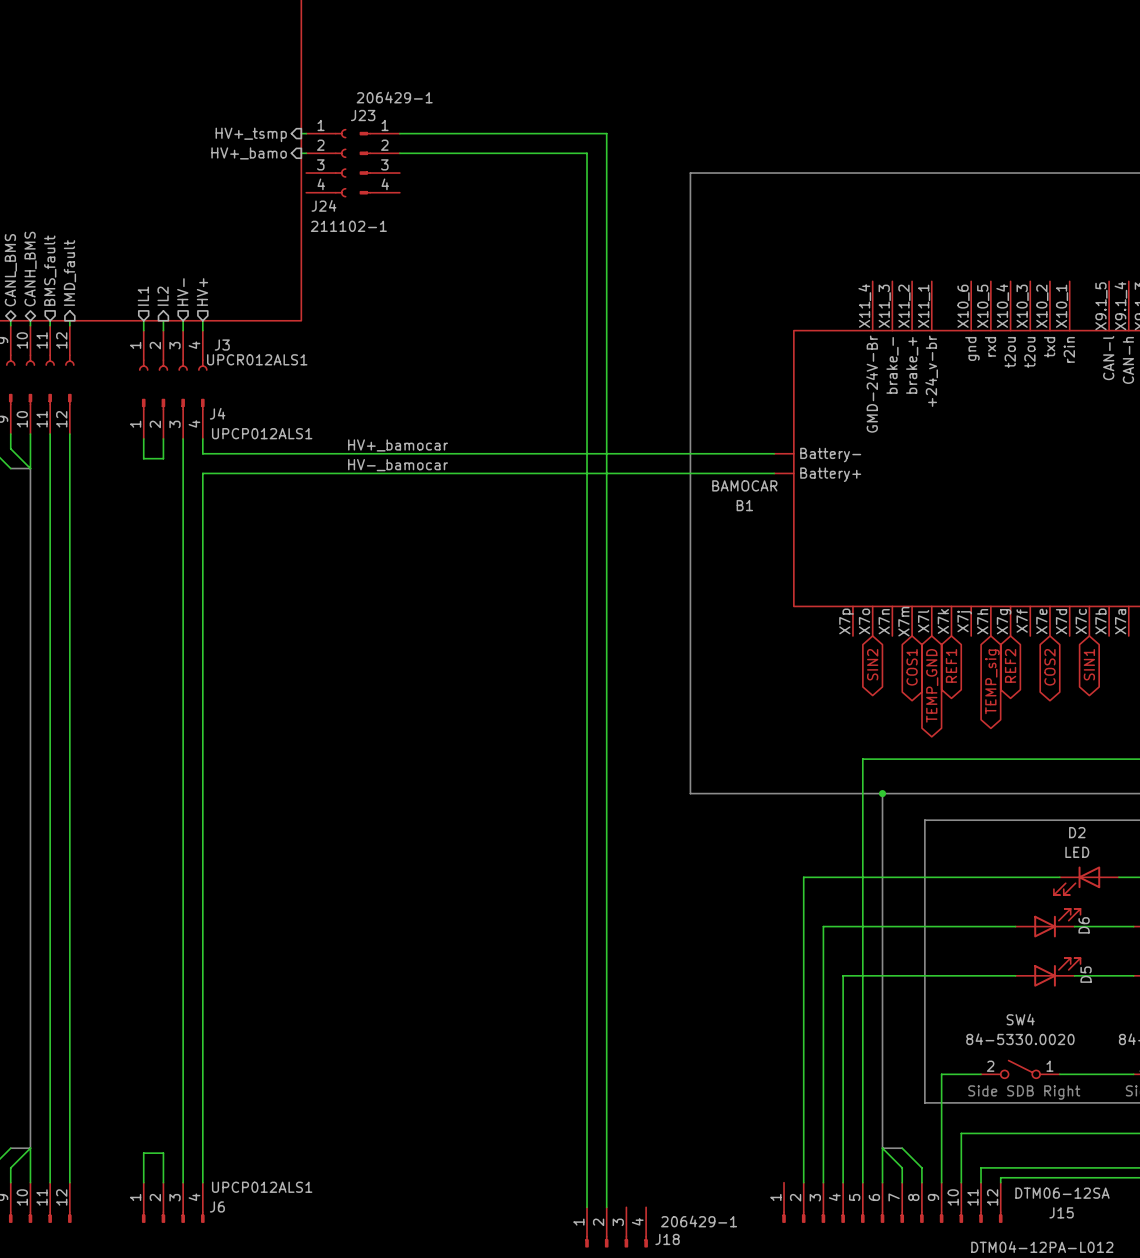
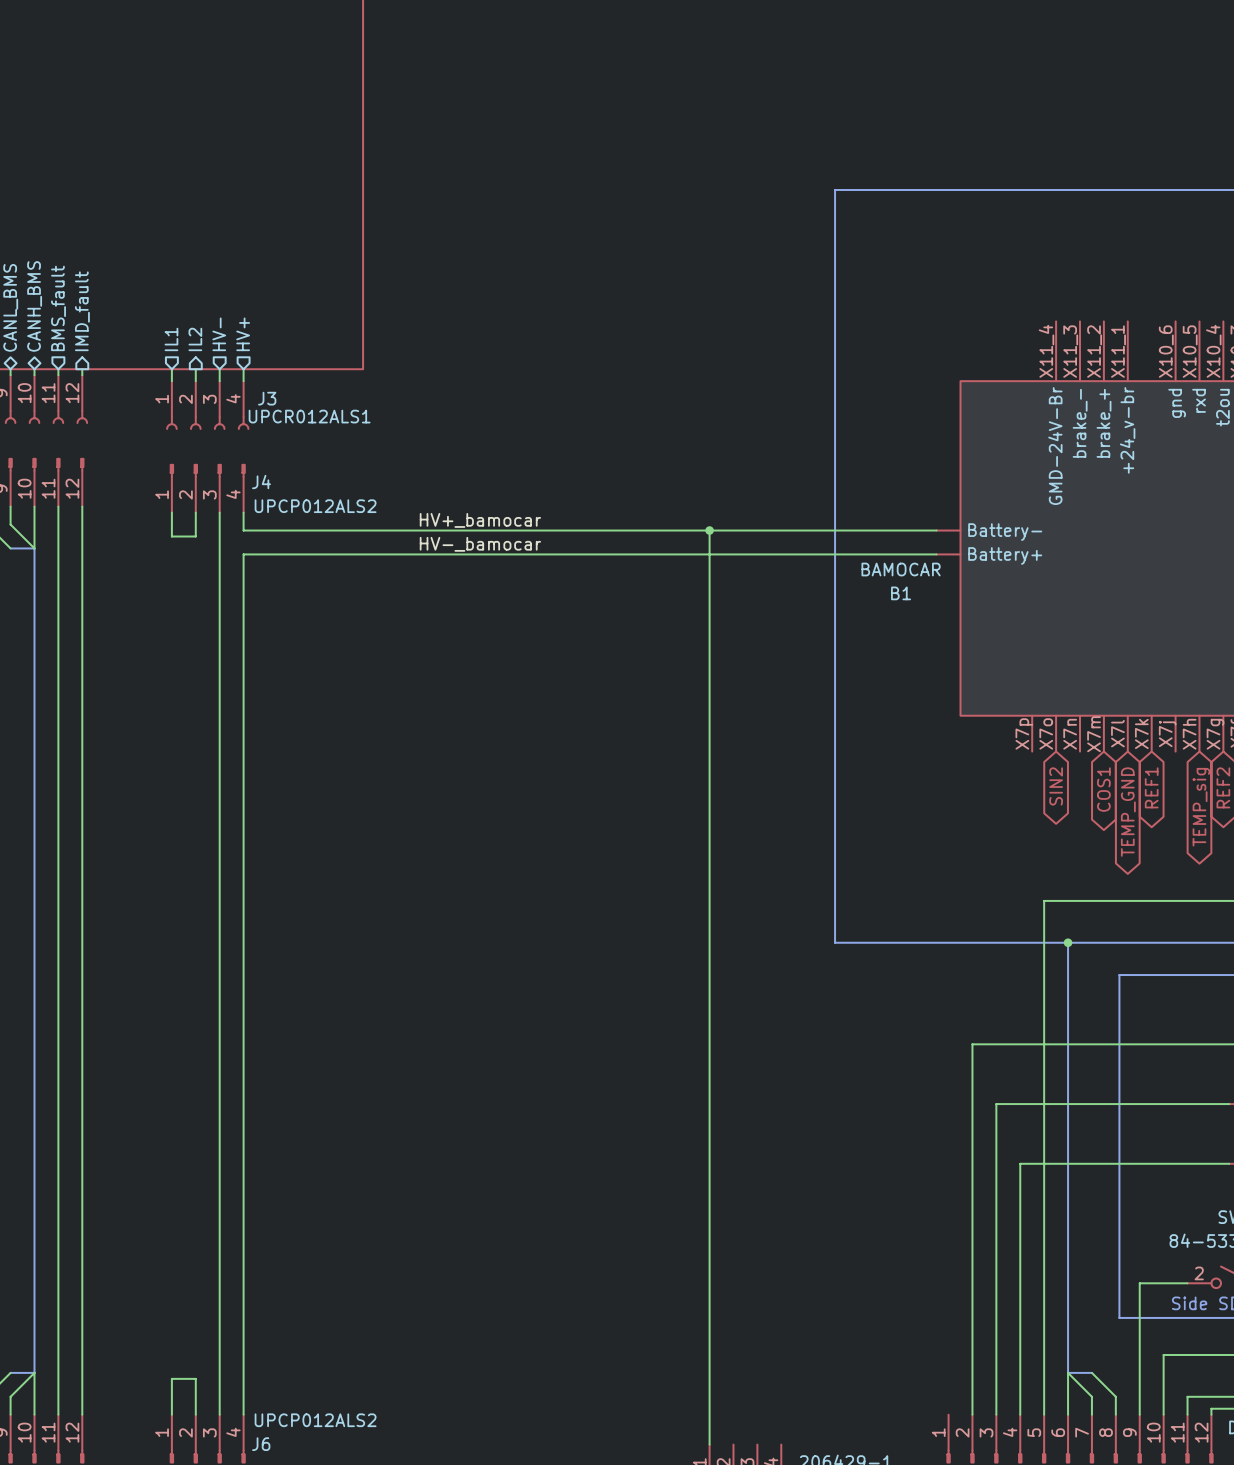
wire: (301, 133) (306, 133) -> none
wire: (399, 133) (606, 133) (606, 1207) -> none
sheet pin: HV+_tsmp (251, 134) -> none
sheet pin: HV+_bamo (249, 153) -> none
wire: (301, 153) (306, 153) -> none
wire: (399, 153) (587, 153) (587, 453) -> none
J24: 211102-1 (326, 163) -> none
J23: 206429-1 (379, 163) -> none
J4 value: UPCP012ALS1 (262, 433) -> UPCP012ALS2 (315, 506)
junction: none -> (709, 530)
J6 value: UPCP012ALS1 (262, 1187) -> UPCP012ALS2 (315, 1420)

